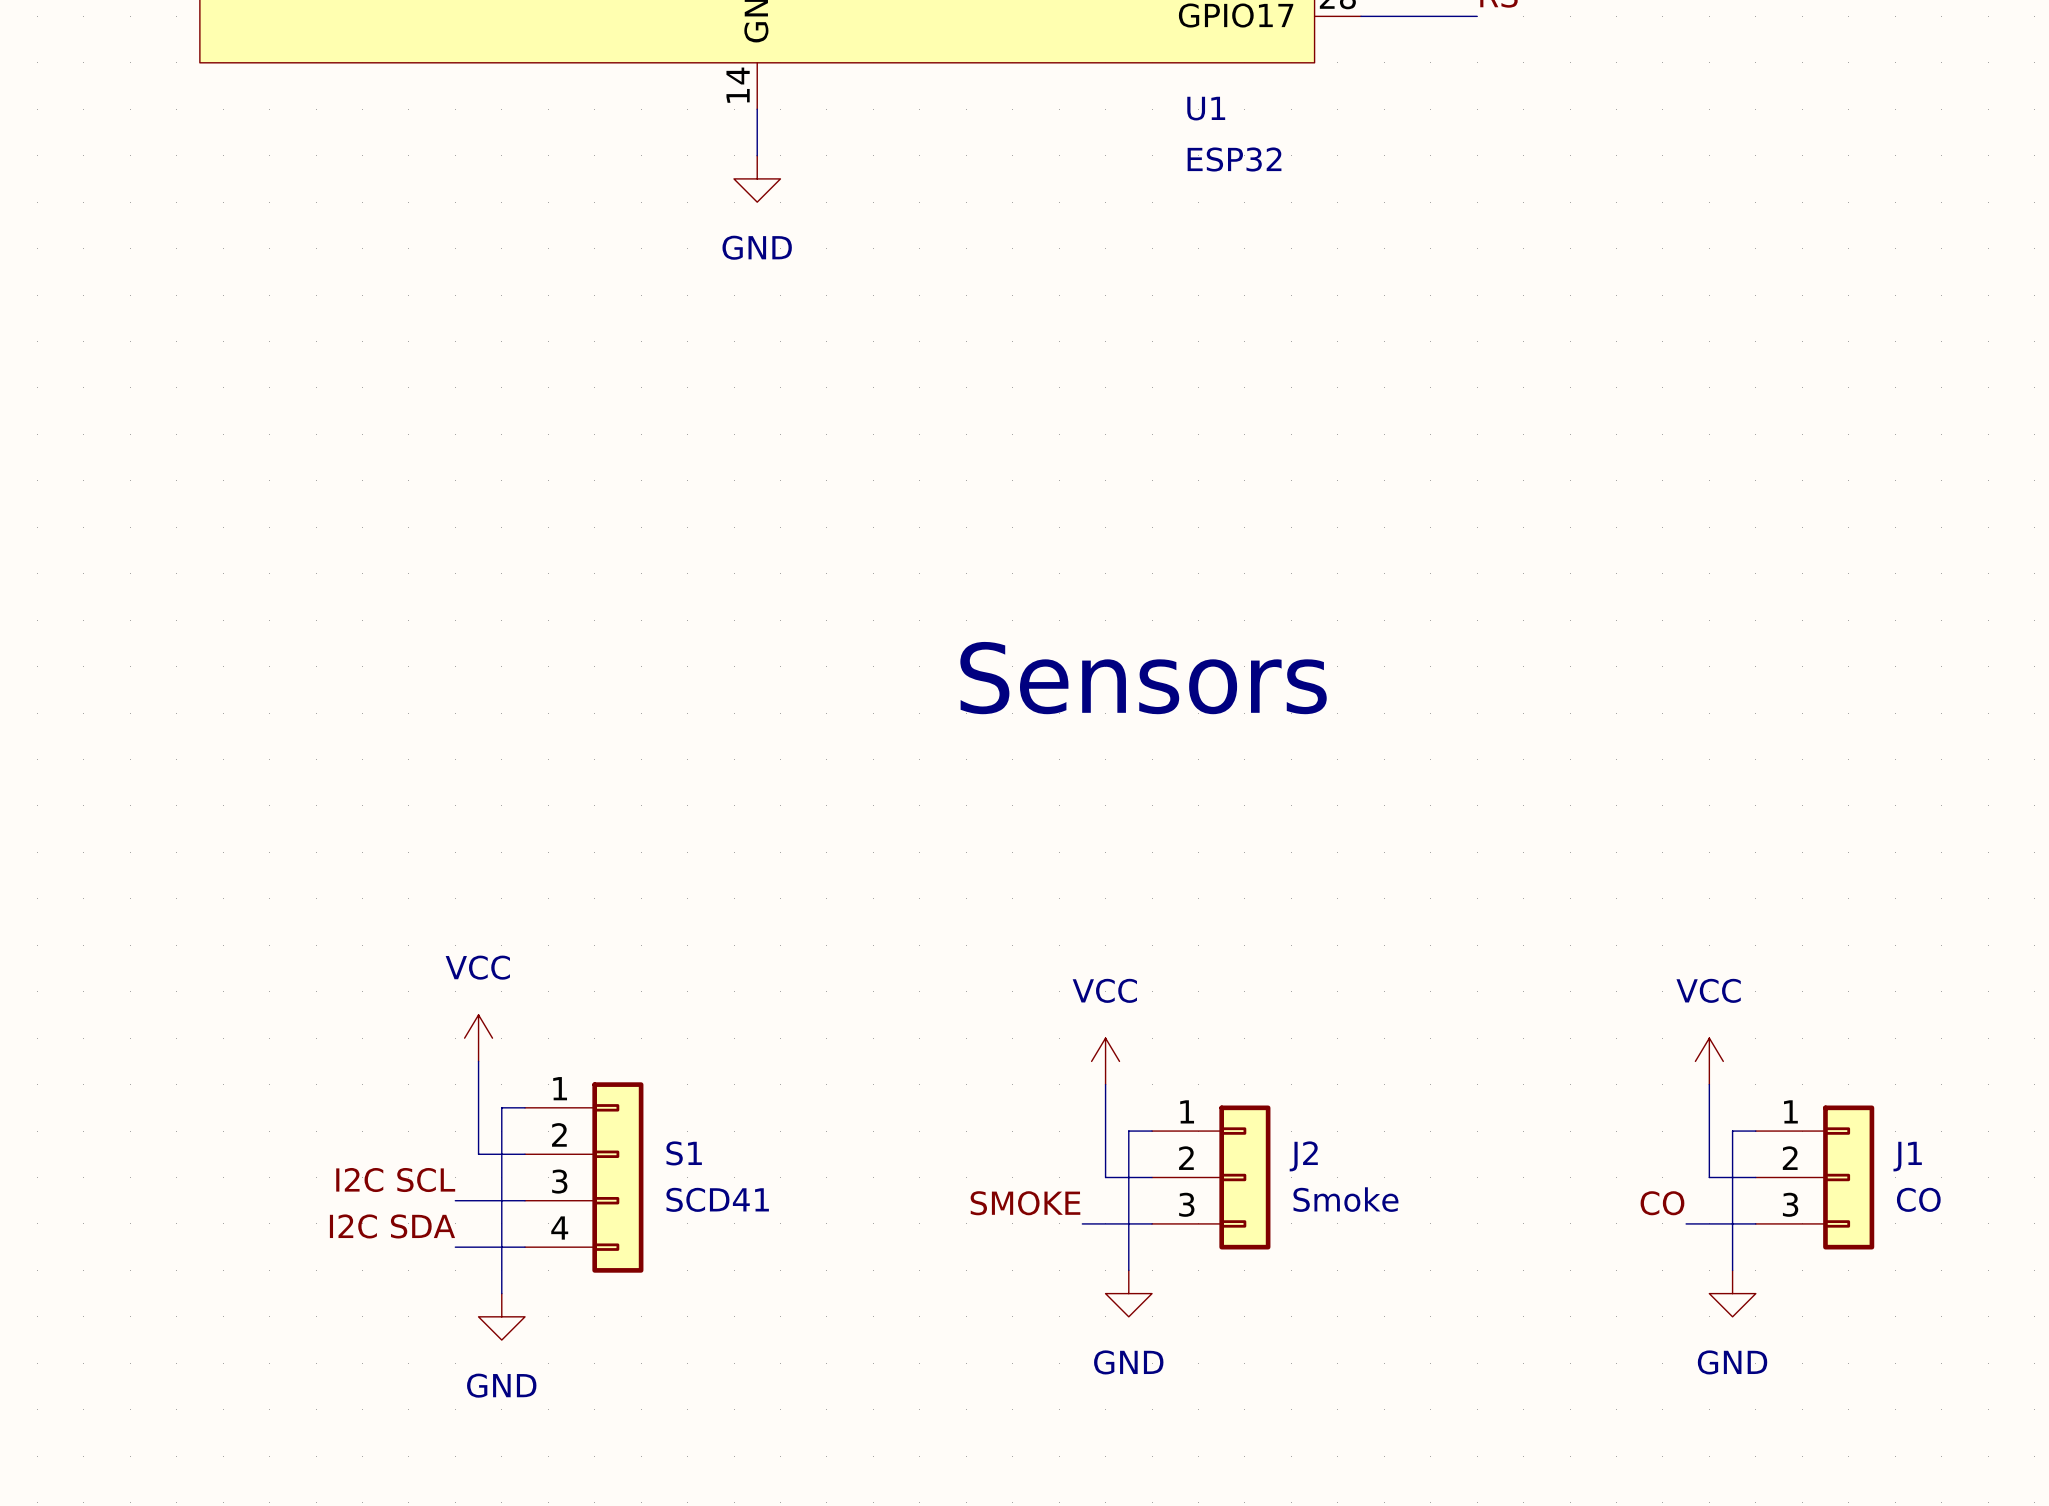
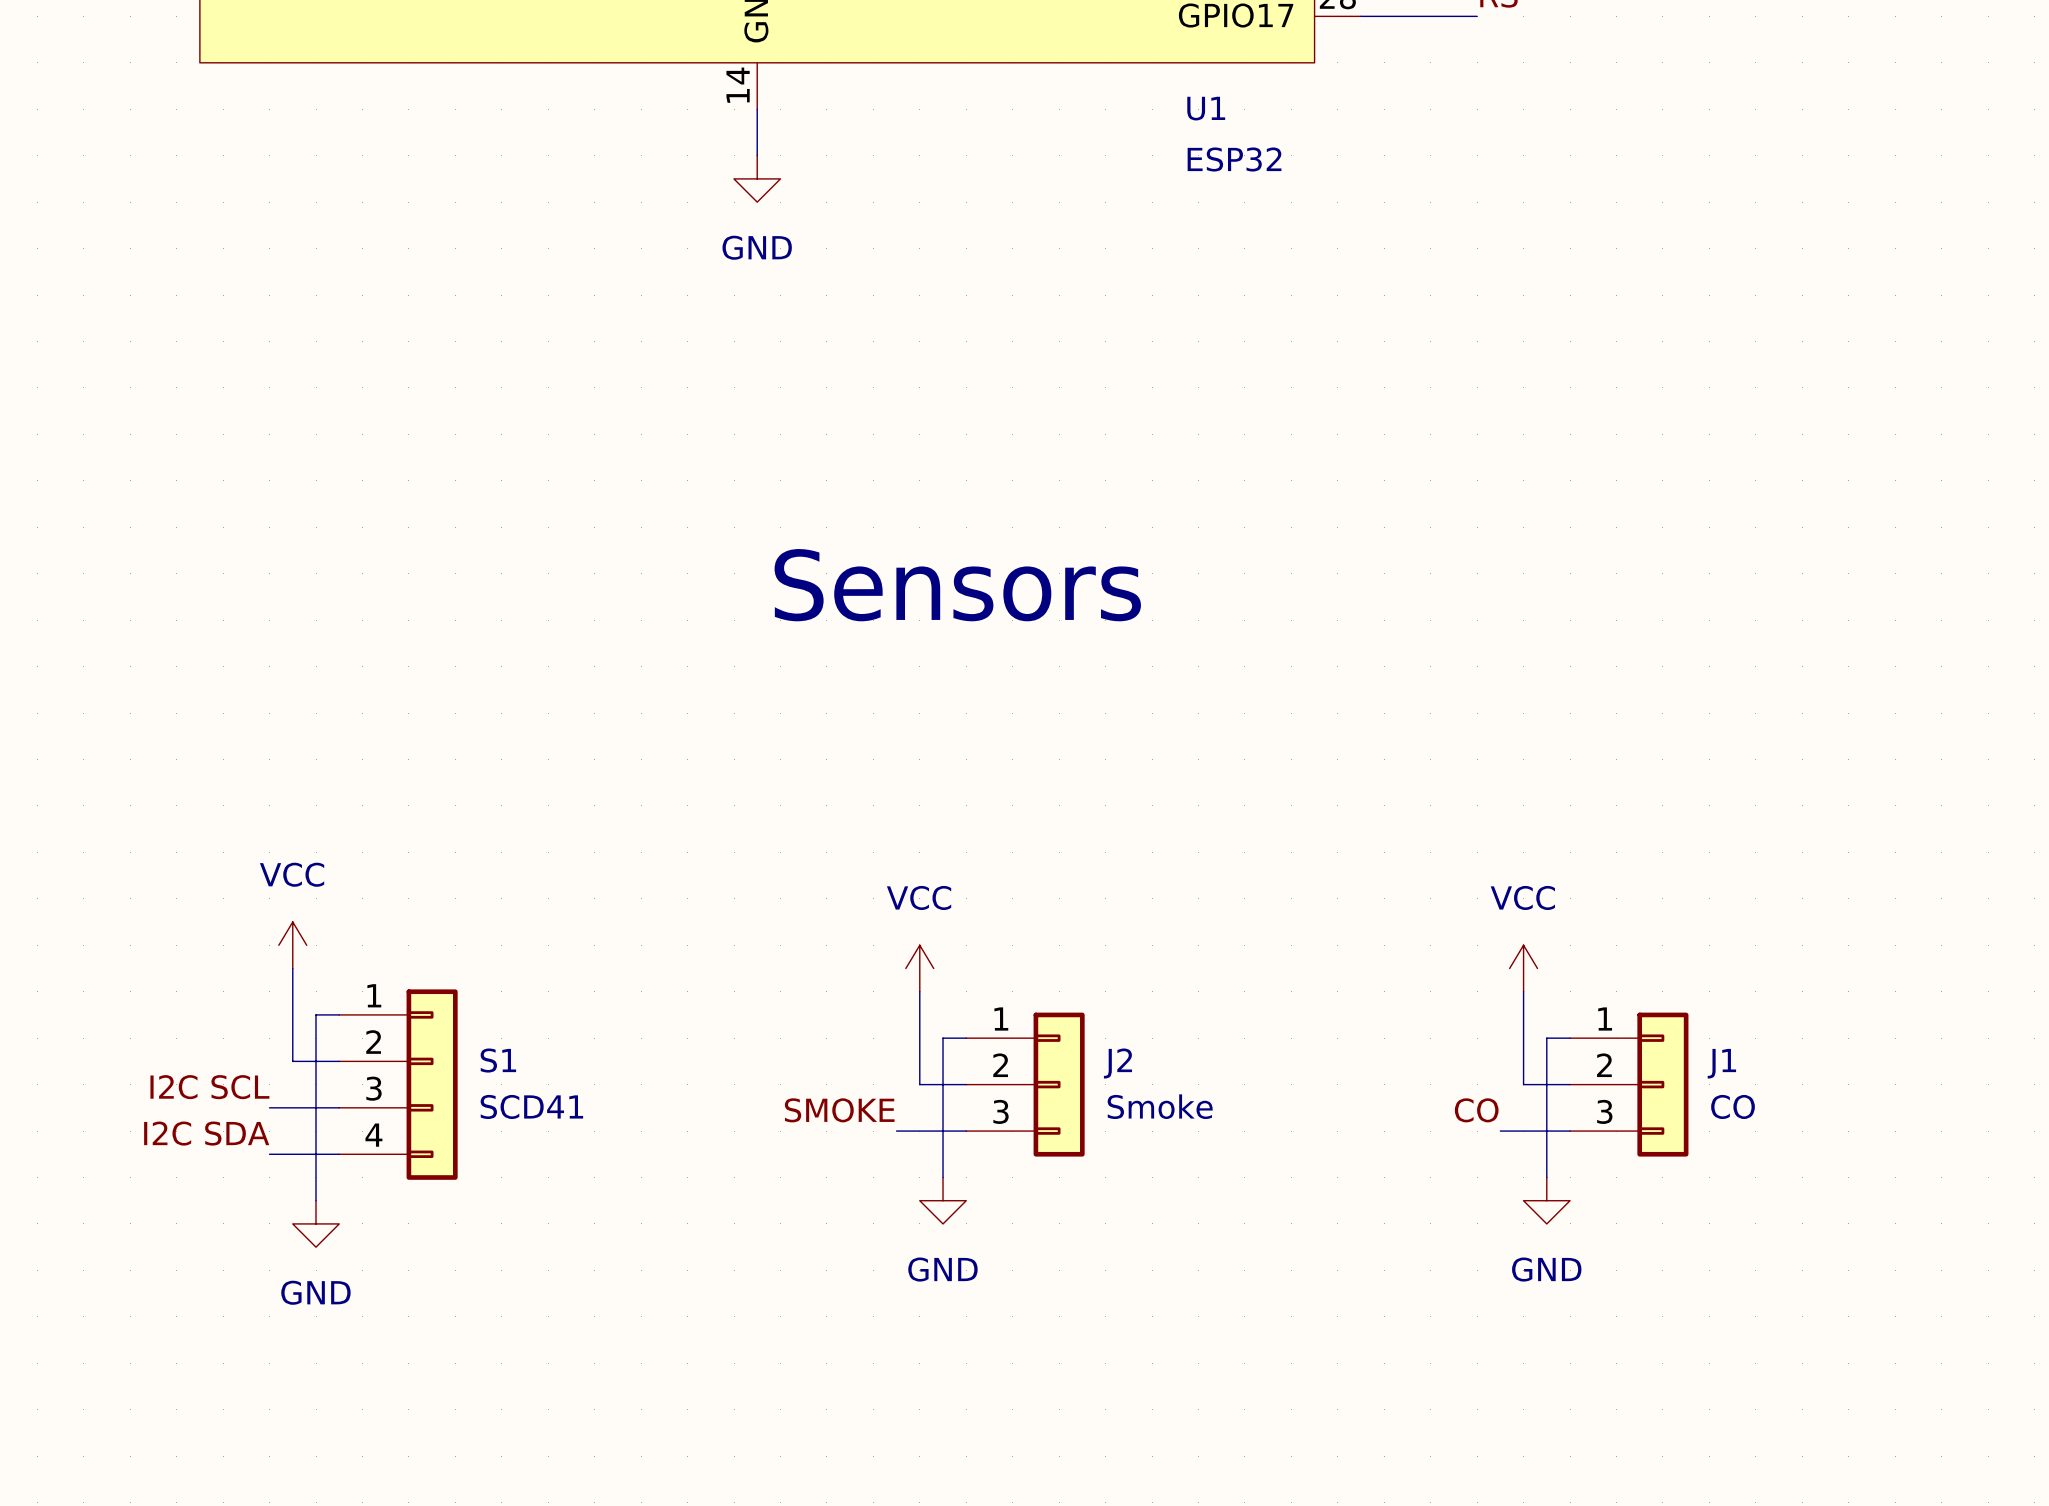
text position: Sensors (1143, 678) -> Sensors (957, 585)
power symbol position: VCC (478, 1038) -> VCC (292, 945)
wire: (478, 1061) (478, 1154) (525, 1154) -> (292, 968) (292, 1061) (339, 1061)
power symbol position: VCC (1105, 1061) -> VCC (919, 968)
power symbol position: VCC (1709, 1061) -> VCC (1523, 968)
wire: (1105, 1084) (1105, 1177) (1152, 1177) -> (919, 991) (919, 1084) (966, 1084)
wire: (1709, 1084) (1709, 1177) (1755, 1177) -> (1523, 991) (1523, 1084) (1570, 1084)
wire: (525, 1107) (501, 1107) (501, 1293) -> (339, 1014) (316, 1014) (316, 1200)
wire: (1152, 1131) (1128, 1131) (1128, 1270) -> (966, 1038) (943, 1038) (943, 1177)
wire: (1755, 1131) (1732, 1131) (1732, 1270) -> (1570, 1038) (1546, 1038) (1546, 1177)
S1 position: (584, 1177) -> (398, 1084)
J2 position: (1211, 1177) -> (1025, 1084)
J1 position: (1815, 1177) -> (1629, 1084)
label position: I2C SCL (395, 1180) -> I2C SCL (209, 1087)
wire: (455, 1200) (525, 1200) -> (269, 1107) (339, 1107)
label position: SMOKE (1025, 1203) -> SMOKE (839, 1110)
label position: CO (1662, 1203) -> CO (1476, 1110)
wire: (1082, 1223) (1152, 1223) -> (896, 1131) (966, 1131)
wire: (1686, 1223) (1755, 1223) -> (1500, 1131) (1570, 1131)
label position: I2C SDA (392, 1226) -> I2C SDA (206, 1133)
wire: (455, 1247) (525, 1247) -> (269, 1154) (339, 1154)
power symbol position: GND (1128, 1293) -> GND (943, 1200)
power symbol position: GND (1732, 1293) -> GND (1546, 1200)
power symbol position: GND (501, 1316) -> GND (316, 1223)

